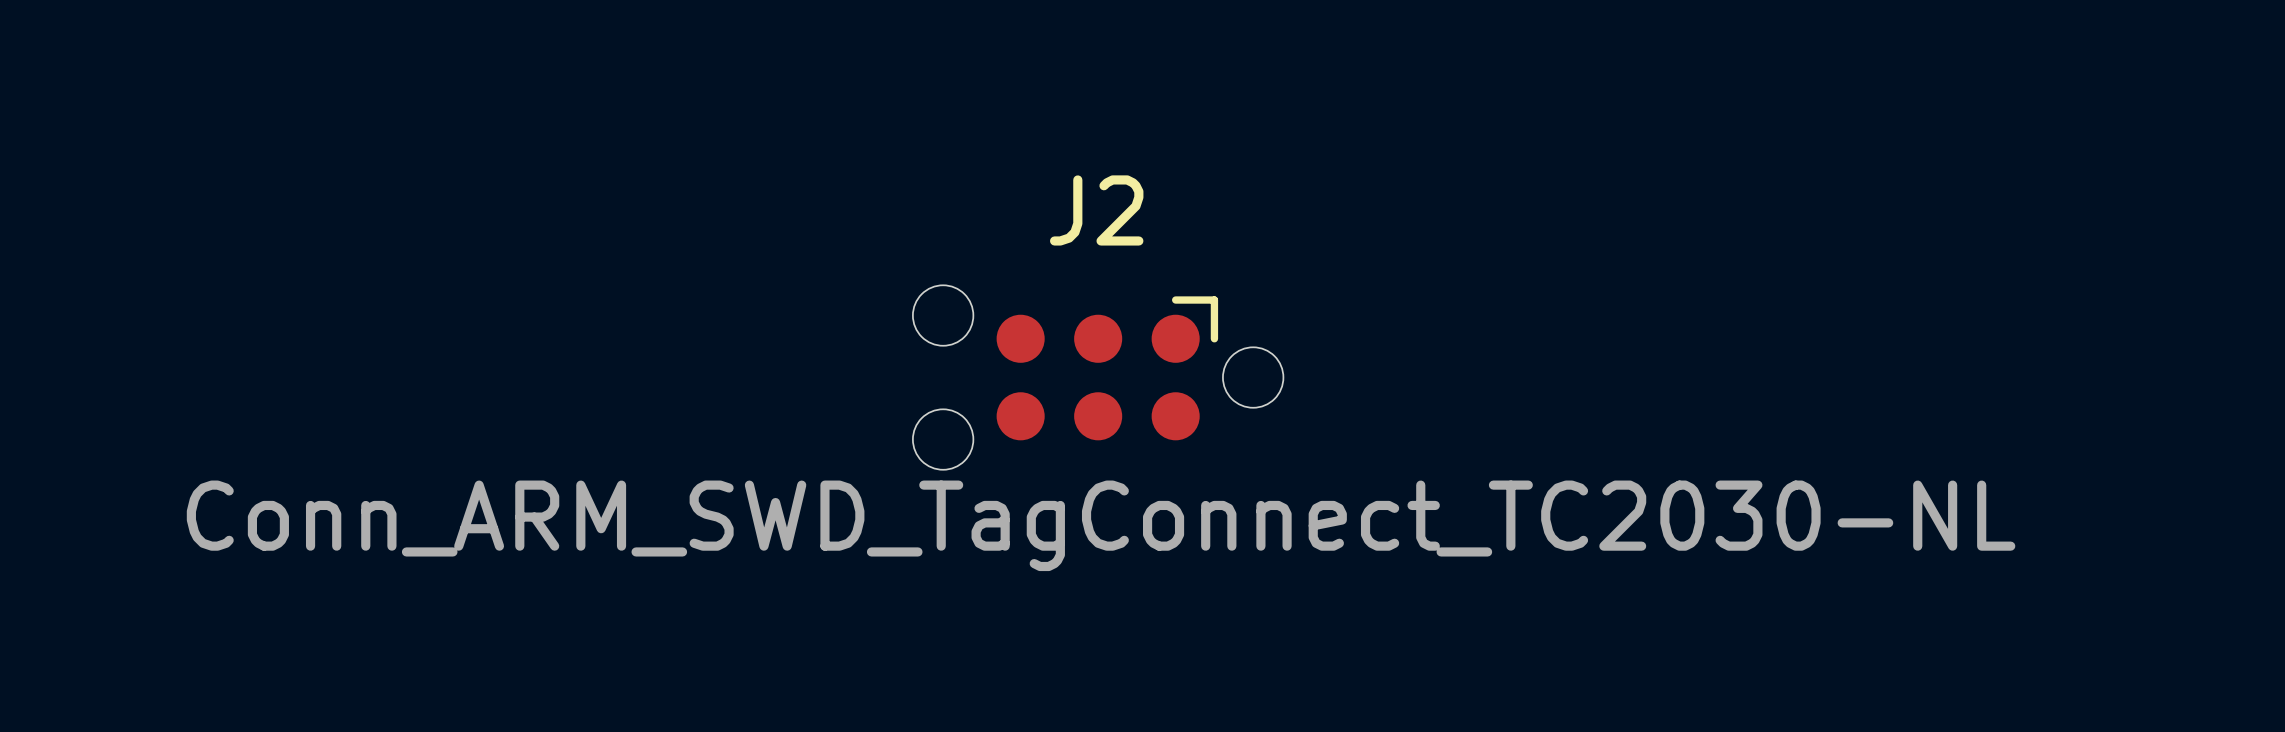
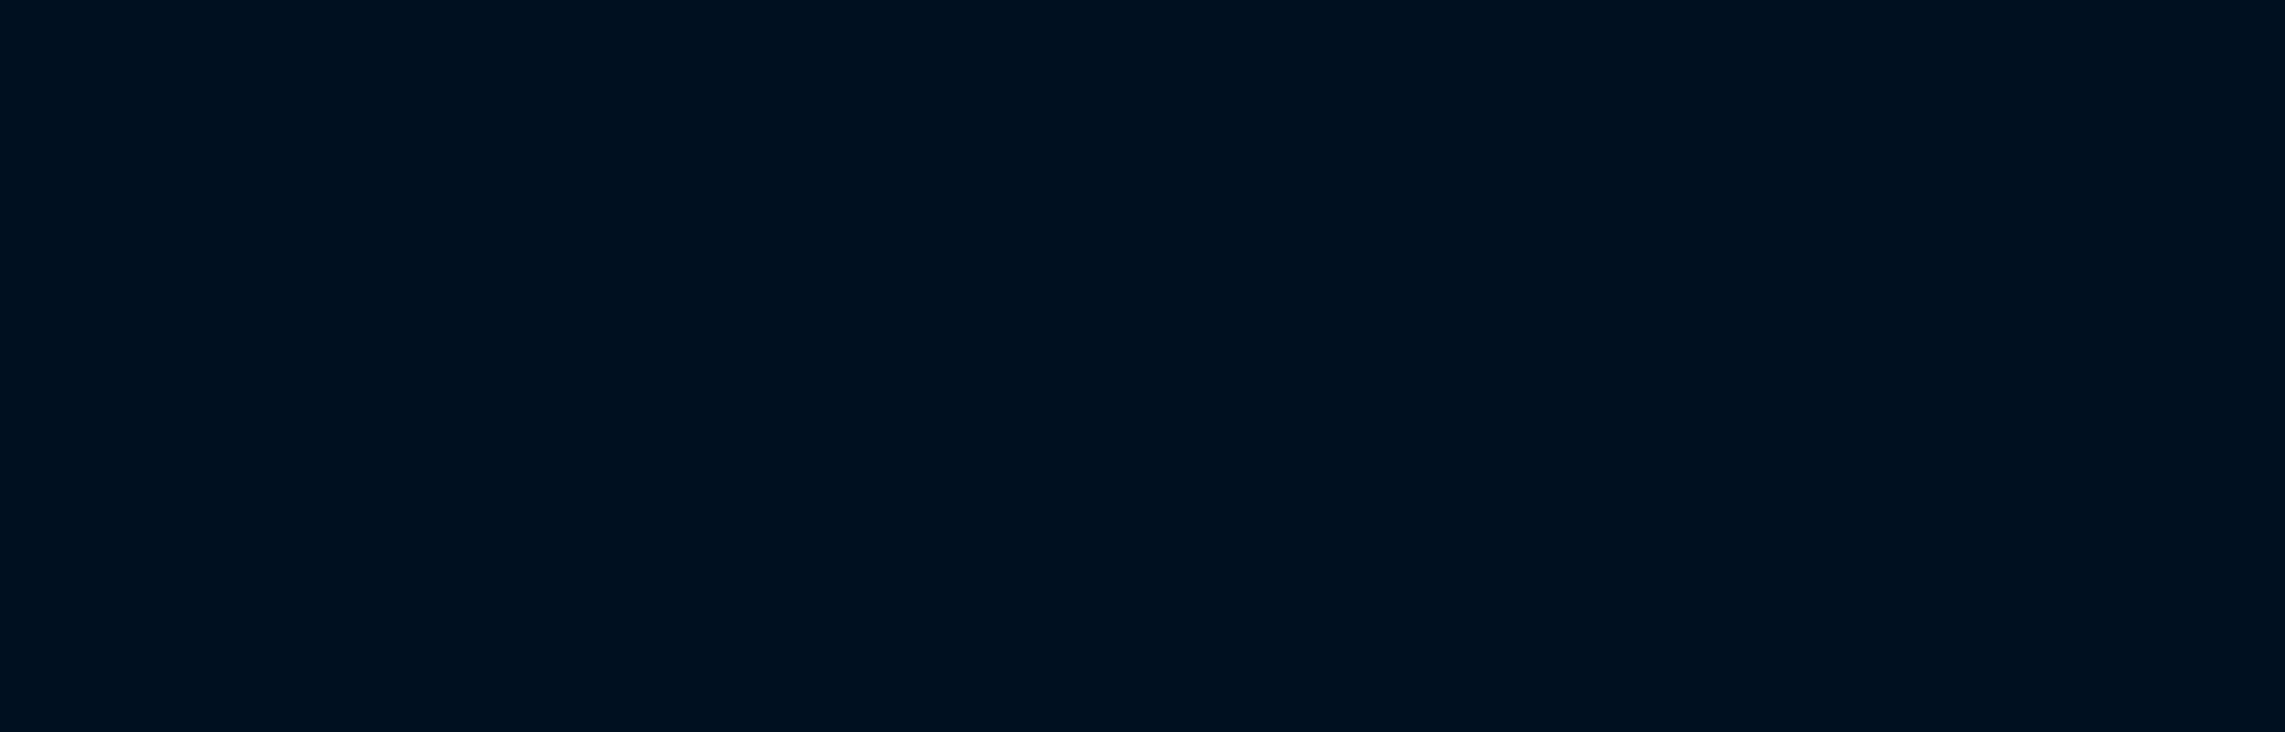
J2: Conn_ARM_SWD_TagConnect_TC2030-NL (1098, 377) -> none

